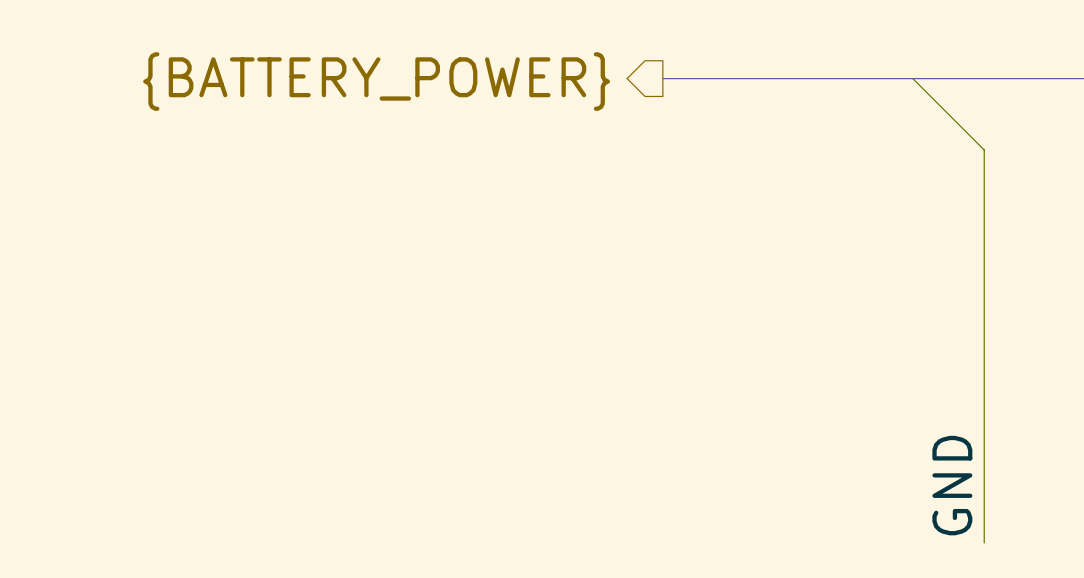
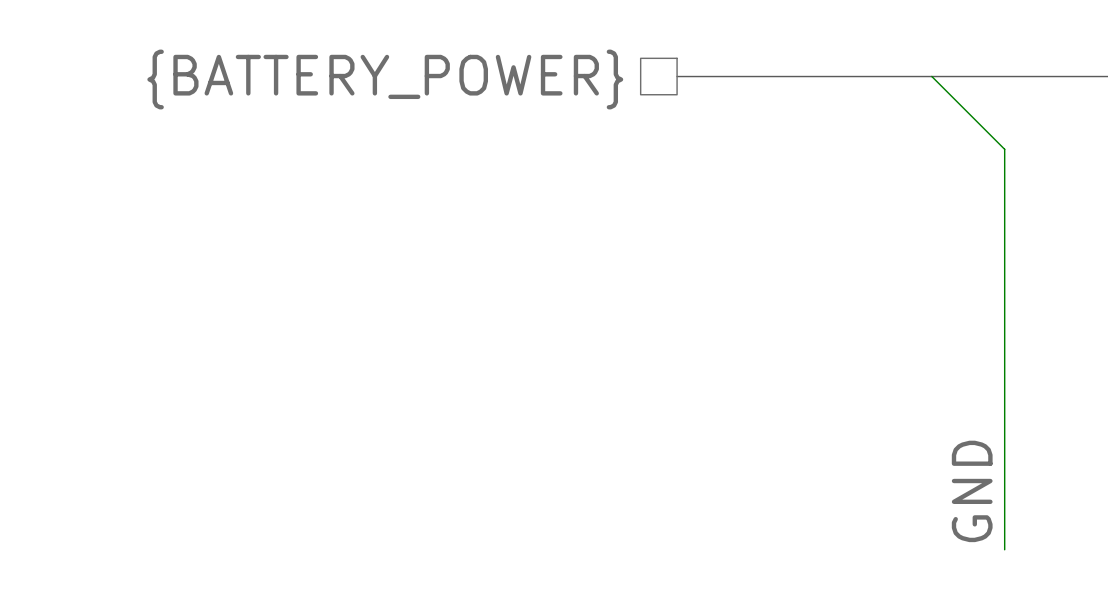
hierarchical label shape: output (376, 81) -> passive (385, 79)

